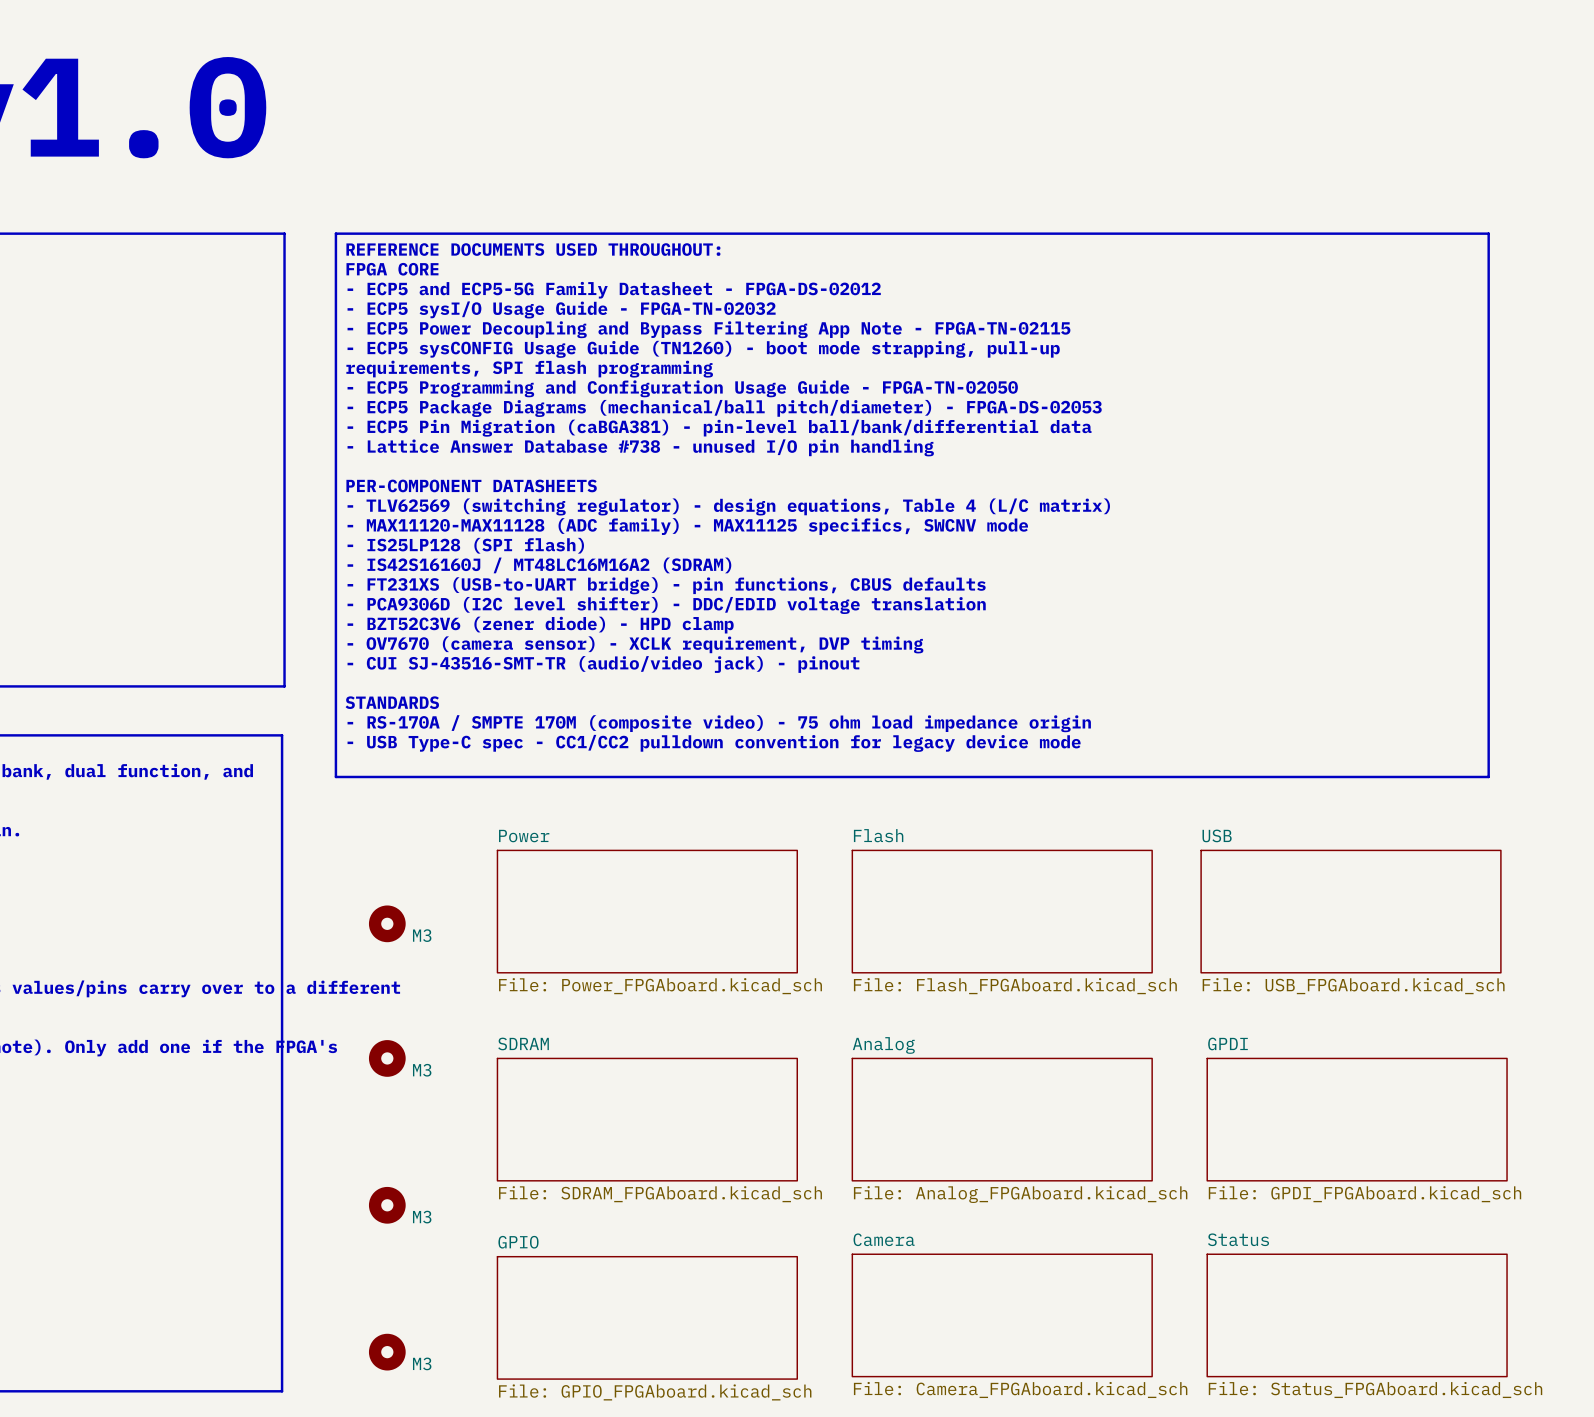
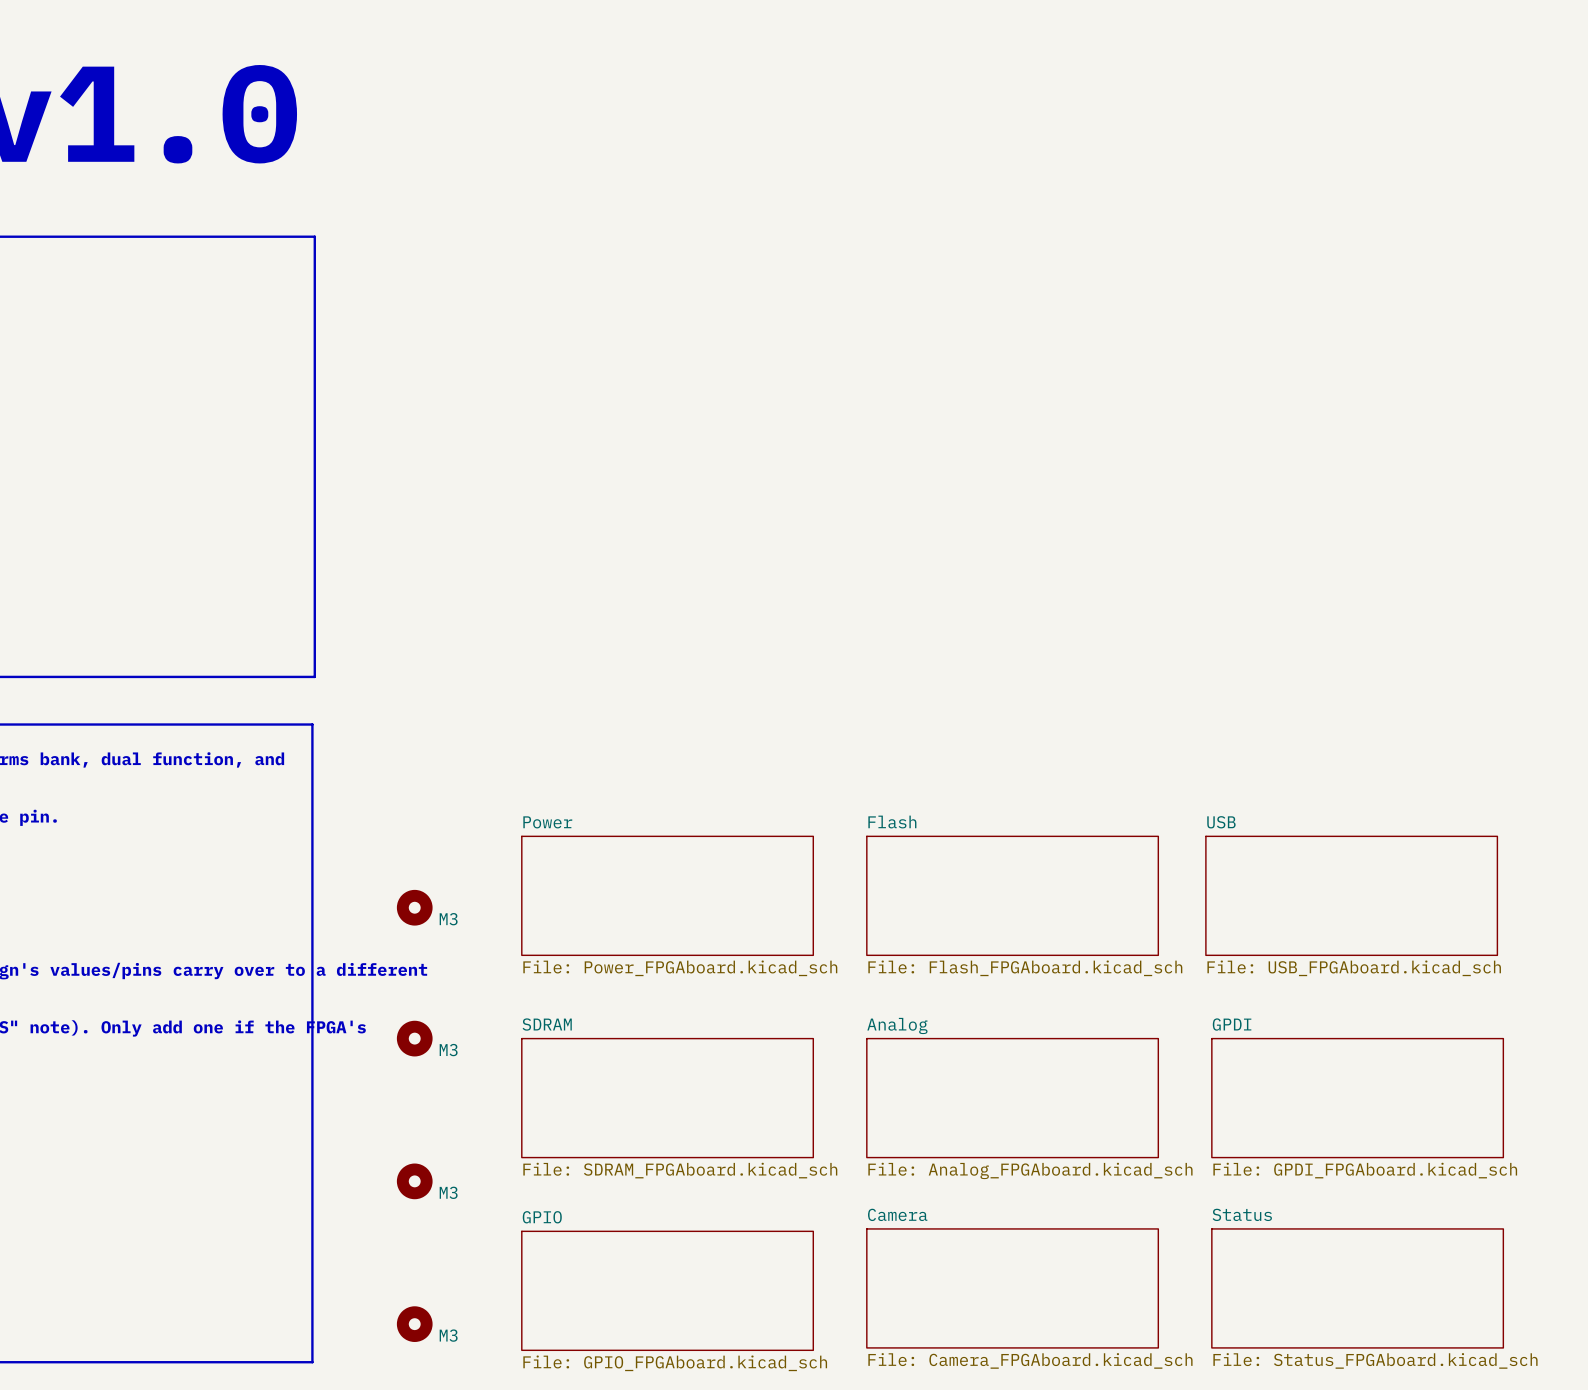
line: (335, 233) (1488, 233) (1488, 776) (335, 776) (335, 233) -> none
text: REFERENCE DOCUMENTS USED THROUGHOUT: (533, 249) -> none
text: FPGA CORE (392, 269) -> none
text: - ECP5 and ECP5-5G Family Datasheet - FPGA-DS-02012 (614, 290) -> none
text: - ECP5 sysI/O Usage Guide - FPGA-TN-02032 (561, 309) -> none
text: - ECP5 Power Decoupling and Bypass Filtering App Note - FPGA-TN-02115 (708, 329) -> none
text: - ECP5 sysCONFIG Usage Guide (TN1260) - boot mode strapping, pull-up (703, 349) -> none
text: requirements, SPI flash programming (529, 369) -> none
text: - ECP5 Programming and Configuration Usage Guide - FPGA-TN-02050 (682, 388) -> none
text: - ECP5 Package Diagrams (mechanical/ball pitch/diameter) - FPGA-DS-02053 (724, 408) -> none
text: - ECP5 Pin Migration (caBGA381) - pin-level ball/bank/differential data (719, 428) -> none
text: - Lattice Answer Database #738 - unused I/O pin handling (640, 447) -> none
text: PER-COMPONENT DATASHEETS (471, 485) -> none
text: - TLV62569 (switching regulator) - design equations, Table 4 (L/C matrix) (728, 506) -> none
text: - MAX11120-MAX11128 (ADC family) - MAX11125 specifics, SWCNV mode (687, 526) -> none
text: - IS25LP128 (SPI flash) (465, 545) -> none
text: - IS42S16160J / MT48LC16M16A2 (SDRAM) (539, 565) -> none
text: - FT231XS (USB-to-UART bridge) - pin functions, CBUS defaults (666, 585) -> none
text: - PCA9306D (I2C level shifter) - DDC/EDID voltage translation (666, 605) -> none
text: - BZT52C3V6 (zener diode) - HPD clamp (540, 625) -> none
text: - OV7670 (camera sensor) - XCLK requirement, DVP timing (635, 644) -> none
text: - CUI SJ-43516-SMT-TR (audio/video jack) - pinout (603, 664) -> none
text: STANDARDS (392, 702) -> none
text: - RS-170A / SMPTE 170M (composite video) - 75 ohm load impedance origin (719, 723) -> none
text: - USB Type-C spec - CC1/CC2 pulldown convention for legacy device mode (714, 743) -> none

